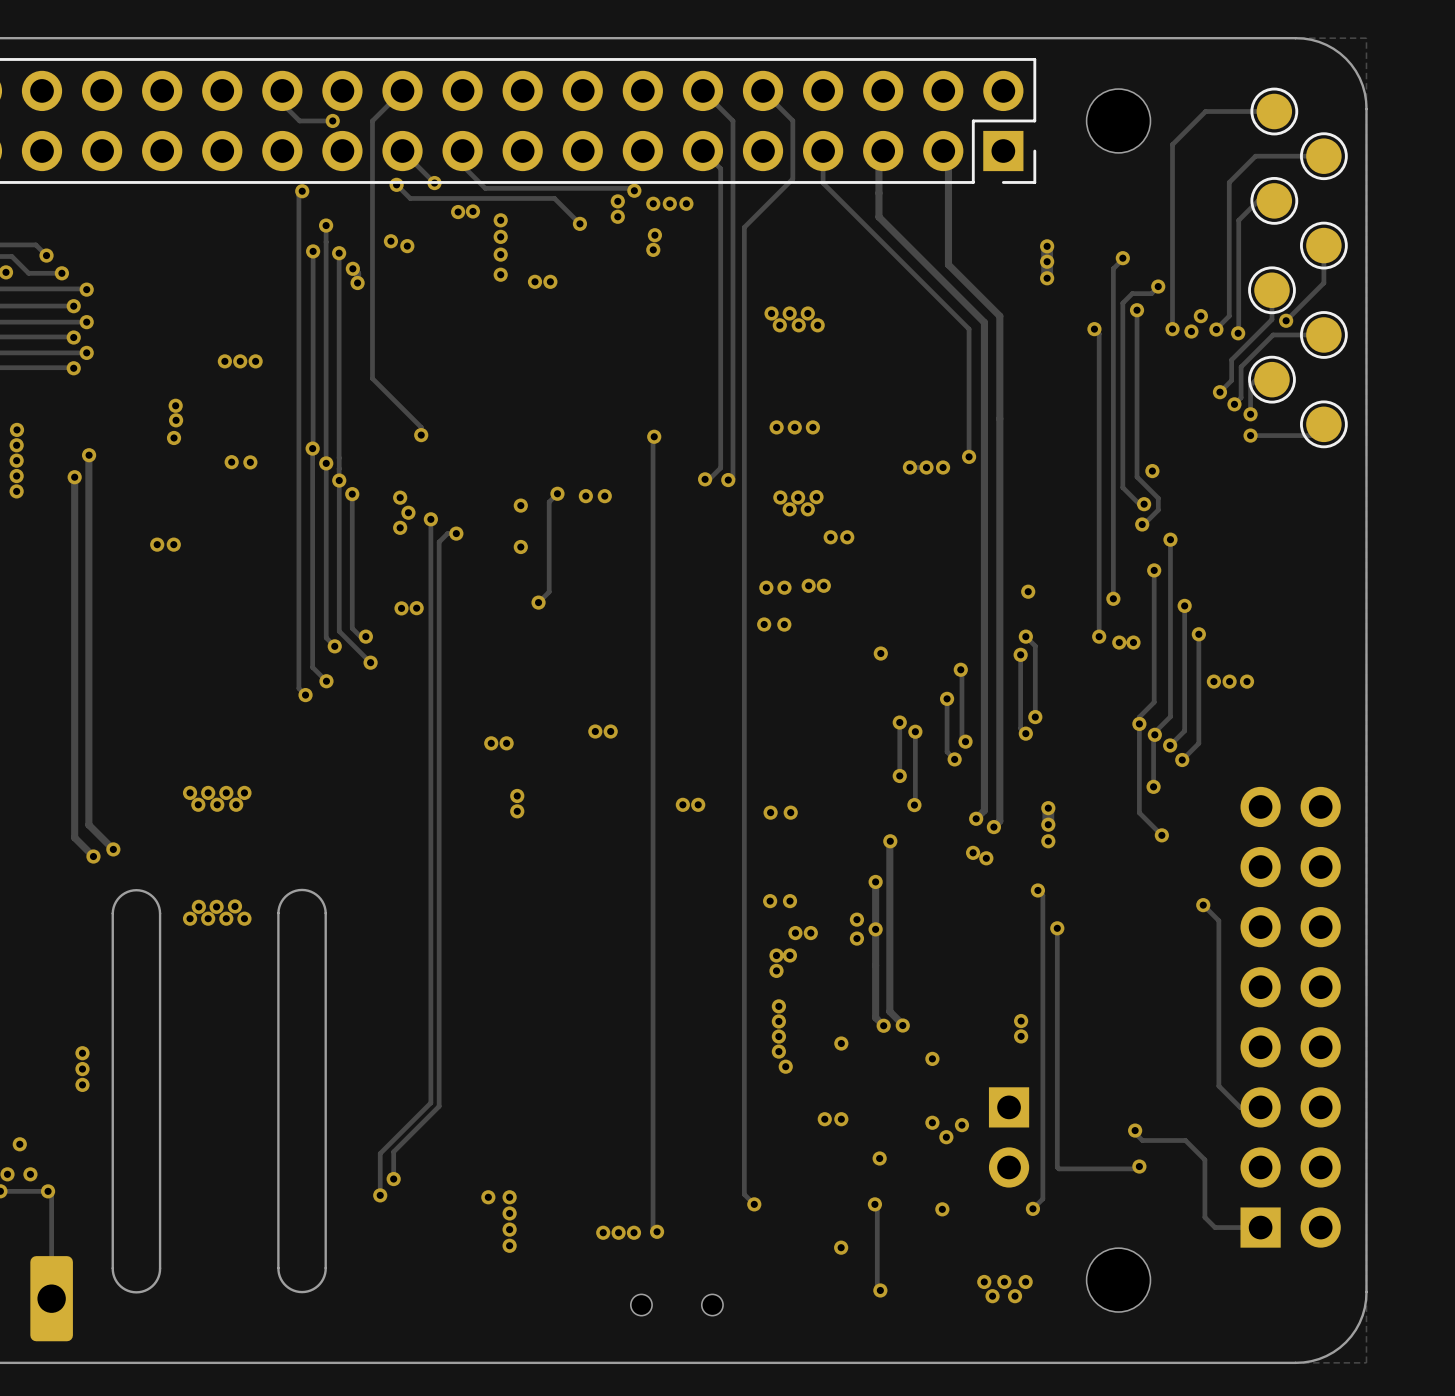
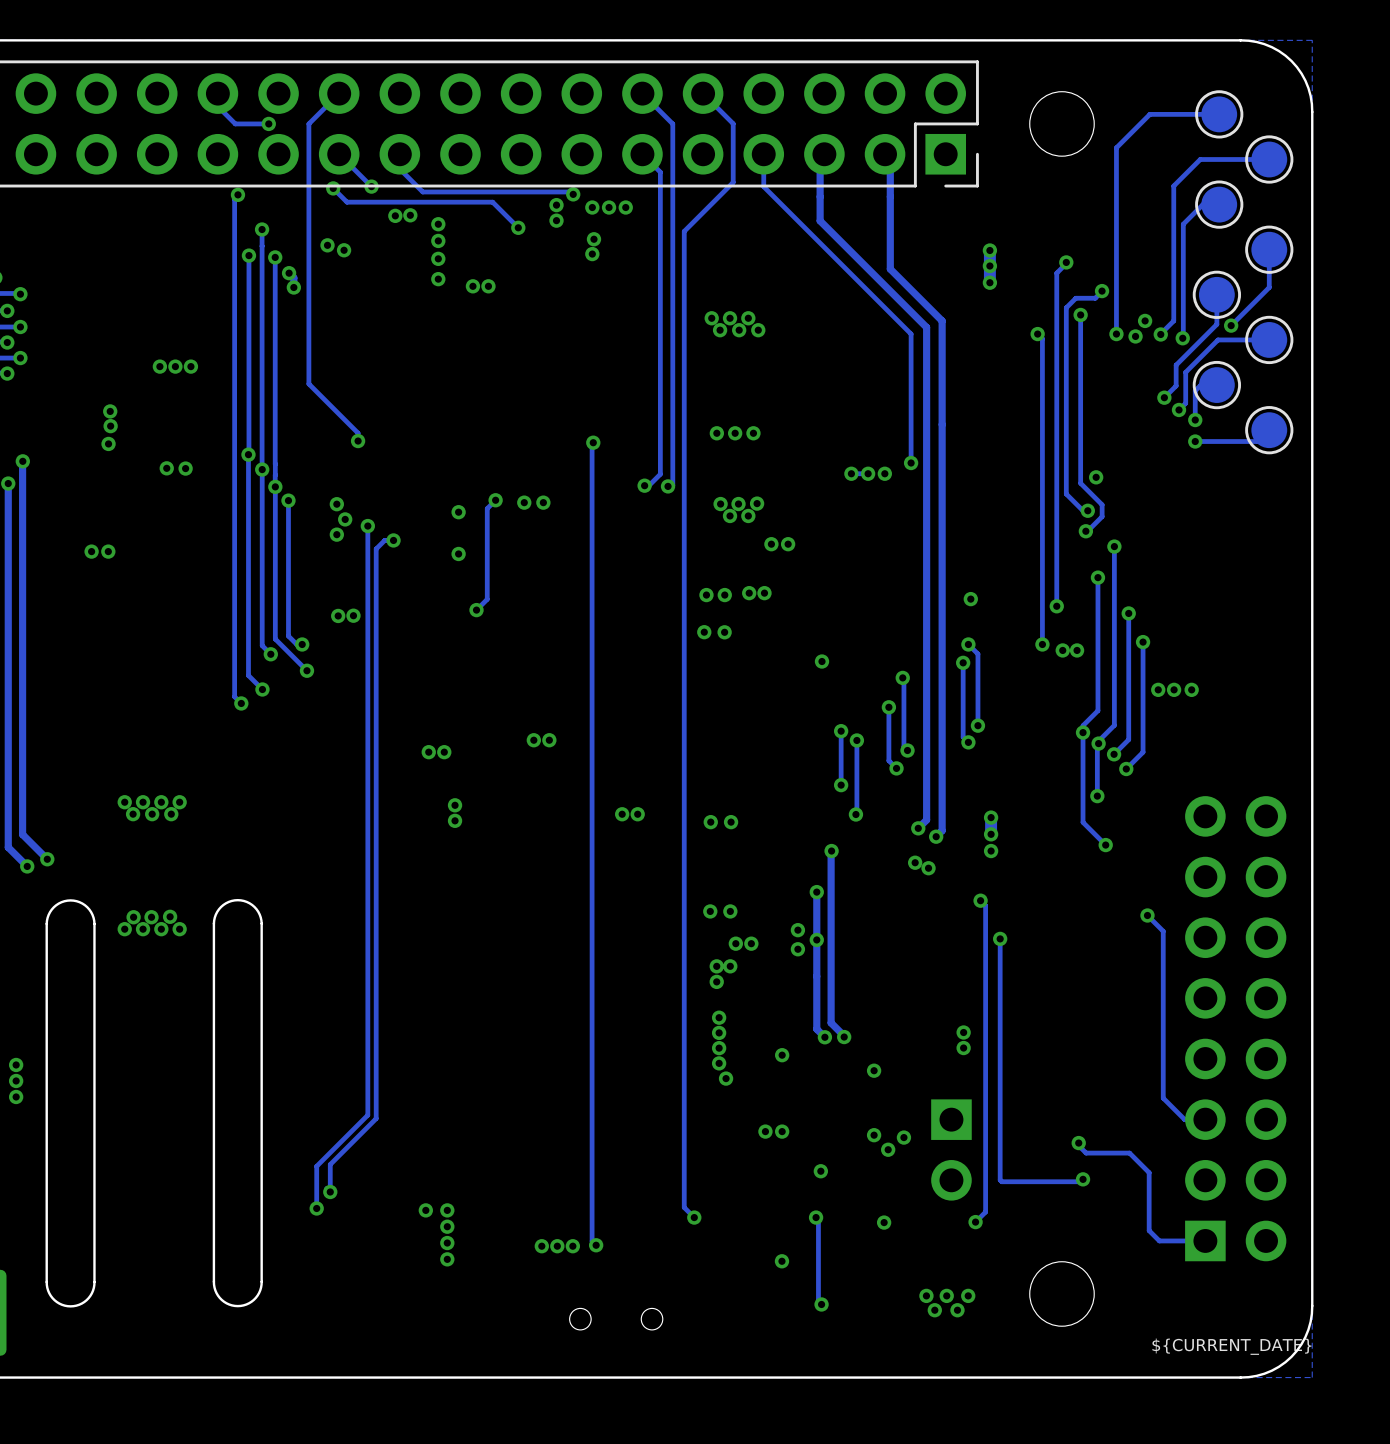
text: none -> ${CURRENT_DATE} (1231, 1346)

